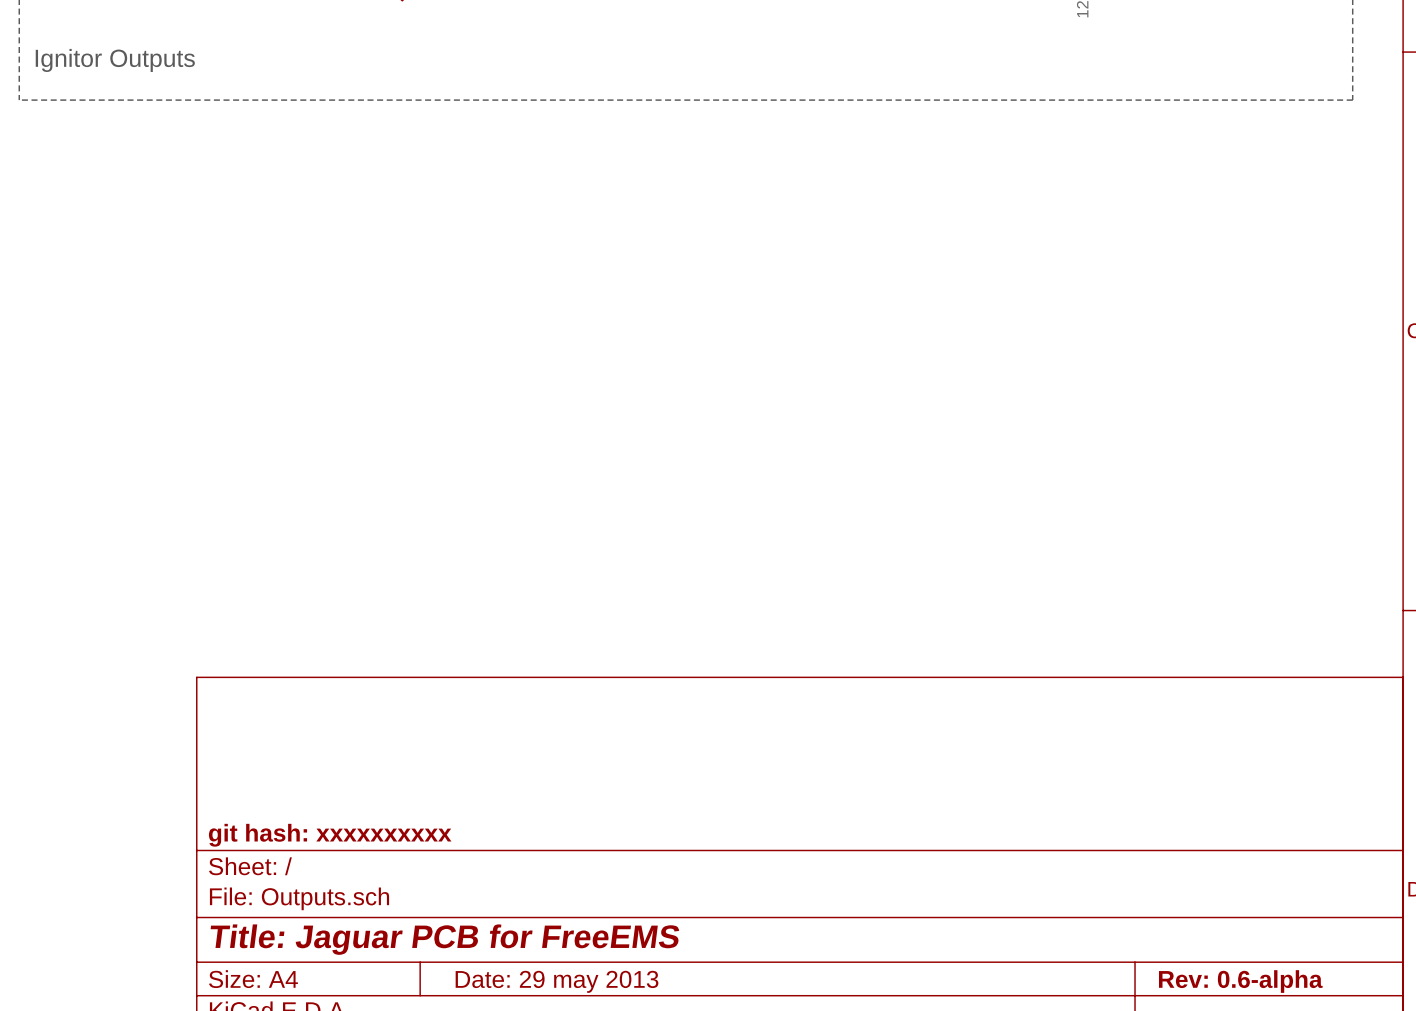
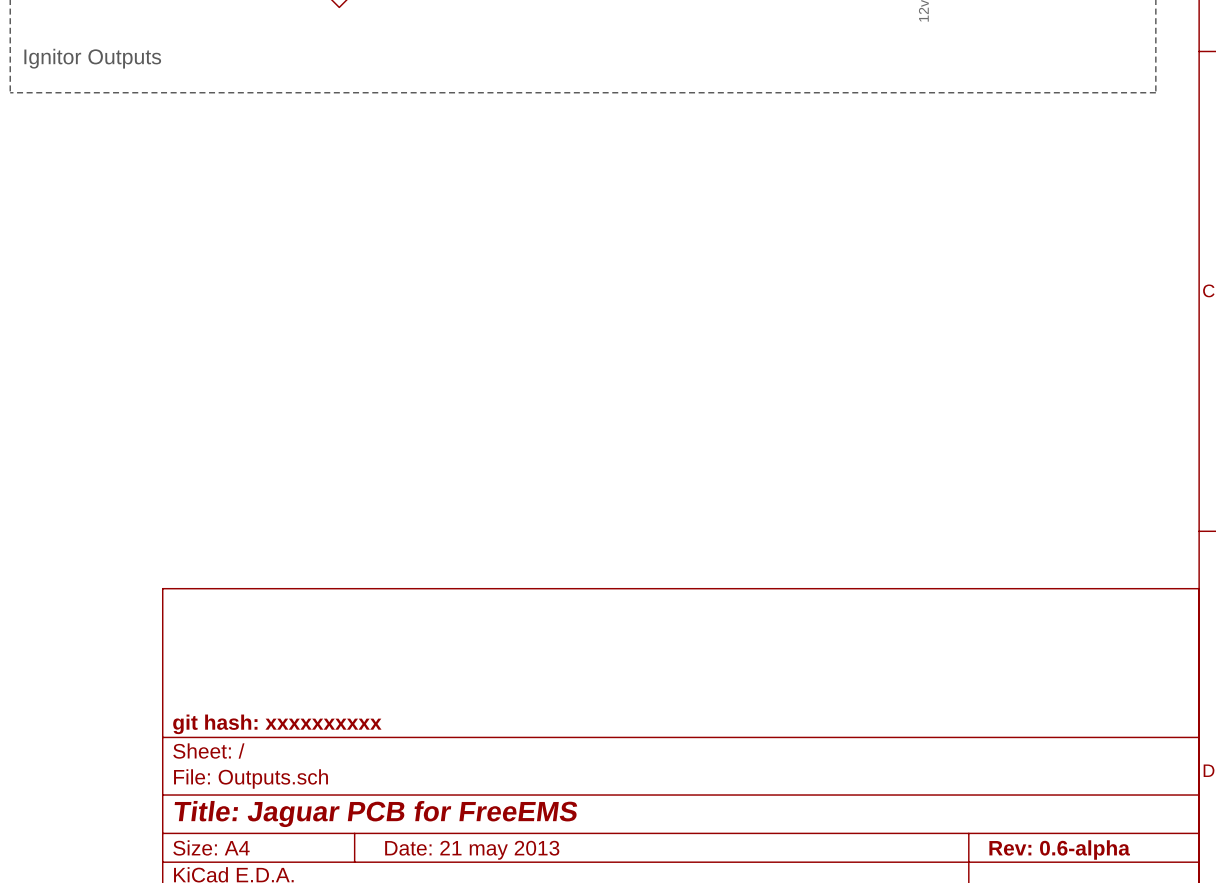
title block: Date: 29 may 2013 (557, 981) -> Date: 21 may 2013 (472, 850)

